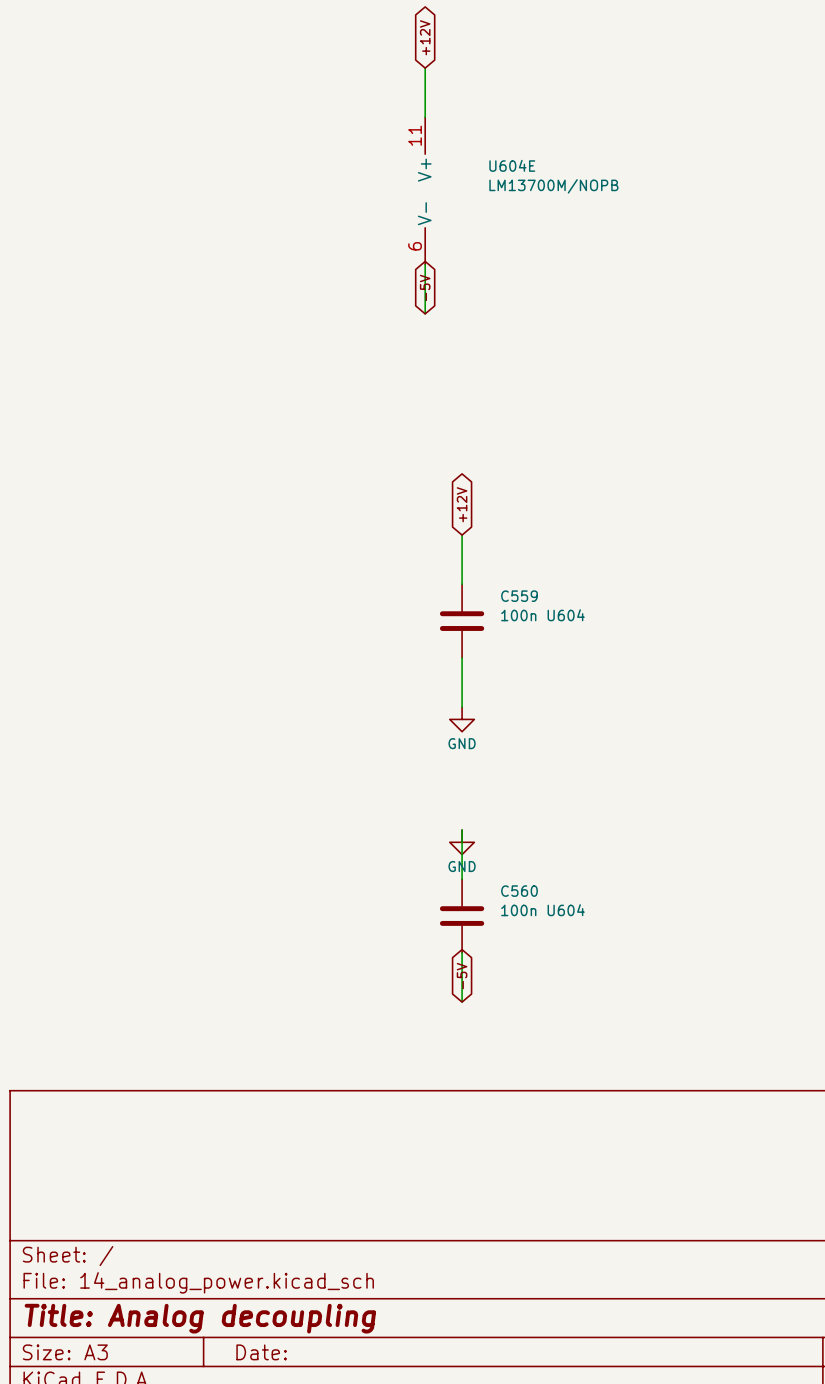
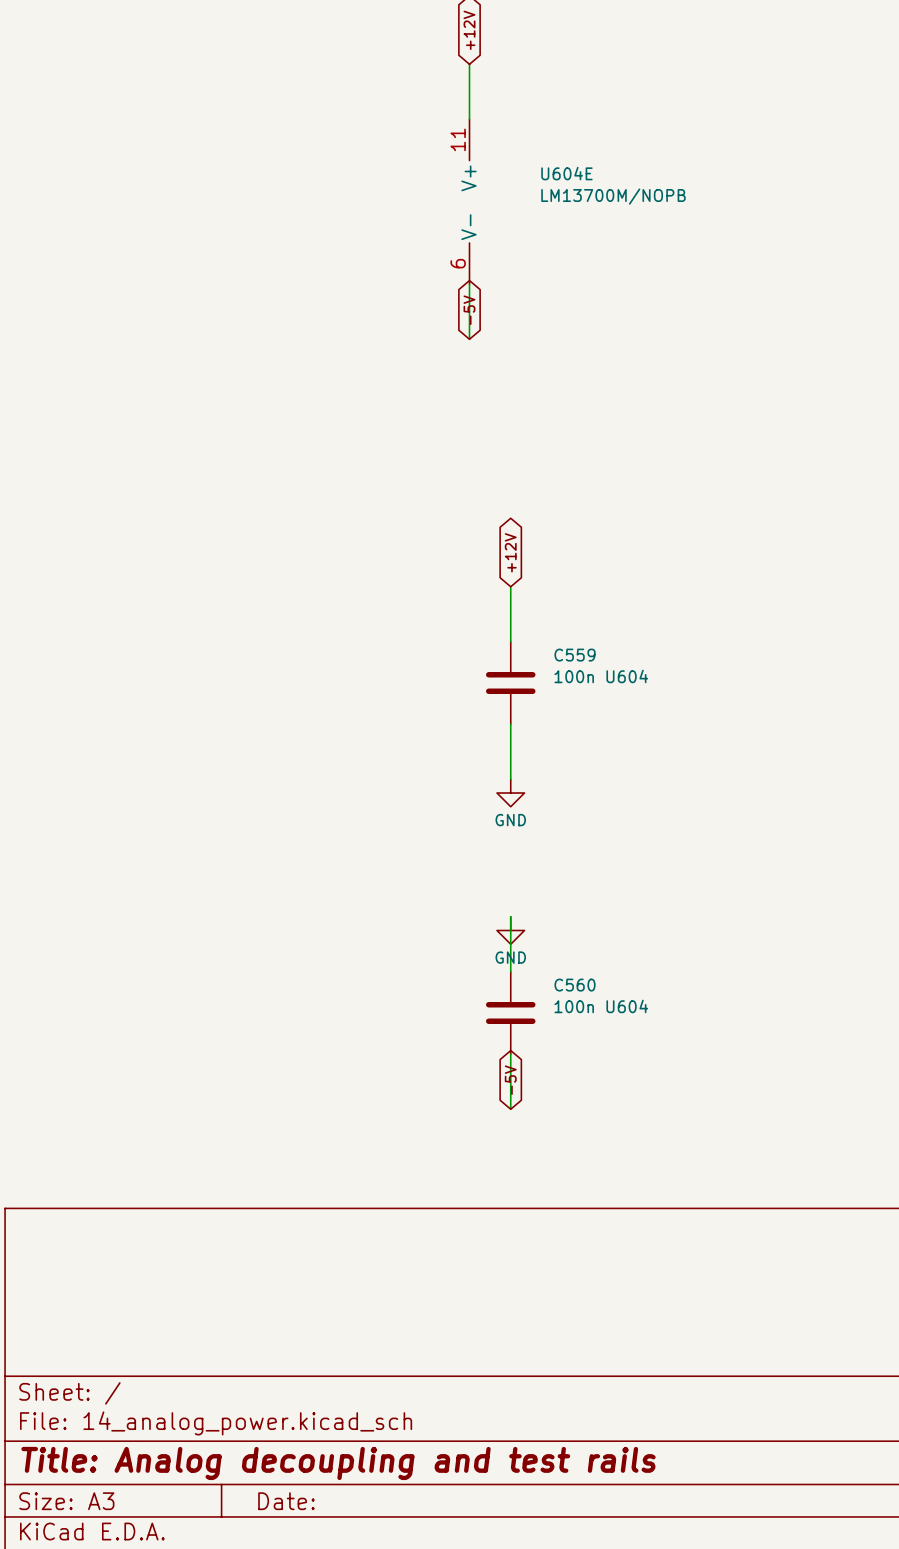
title block: Title: Analog decoupling (200, 1318) -> Title: Analog decoupling and test rails (338, 1463)

